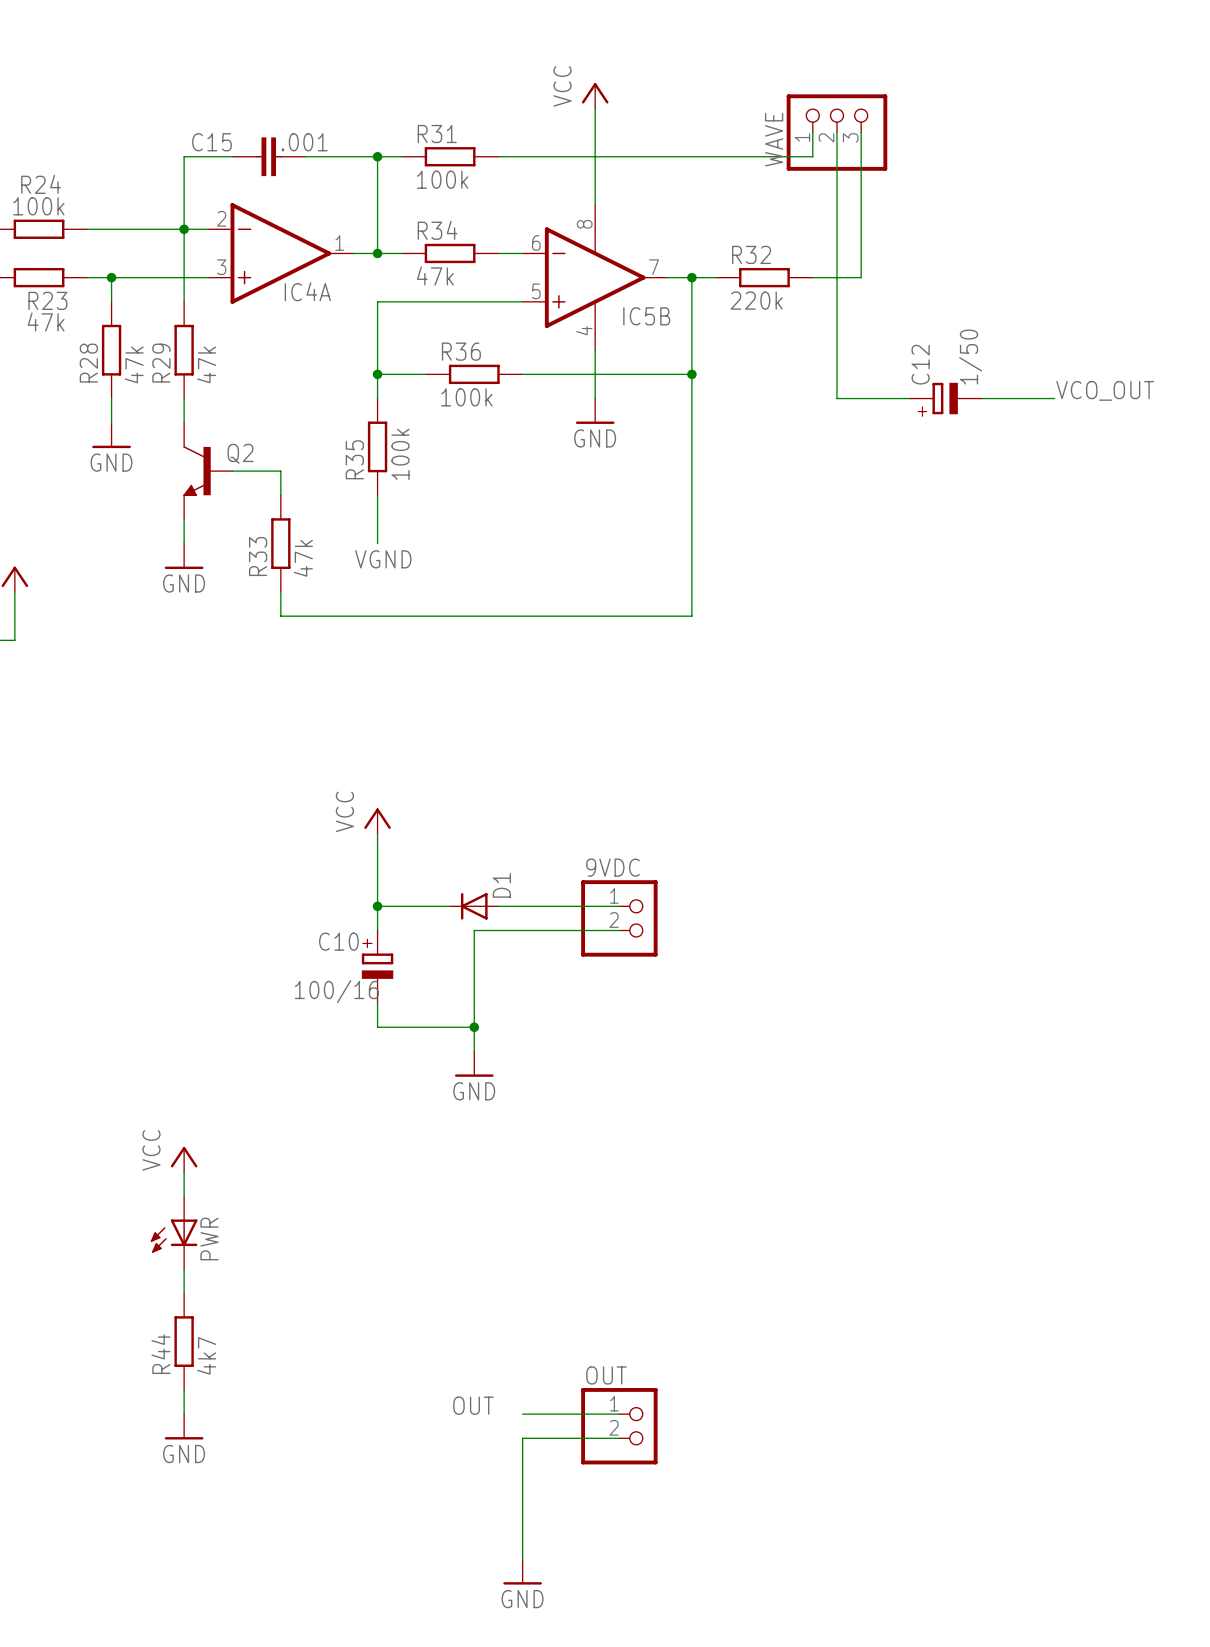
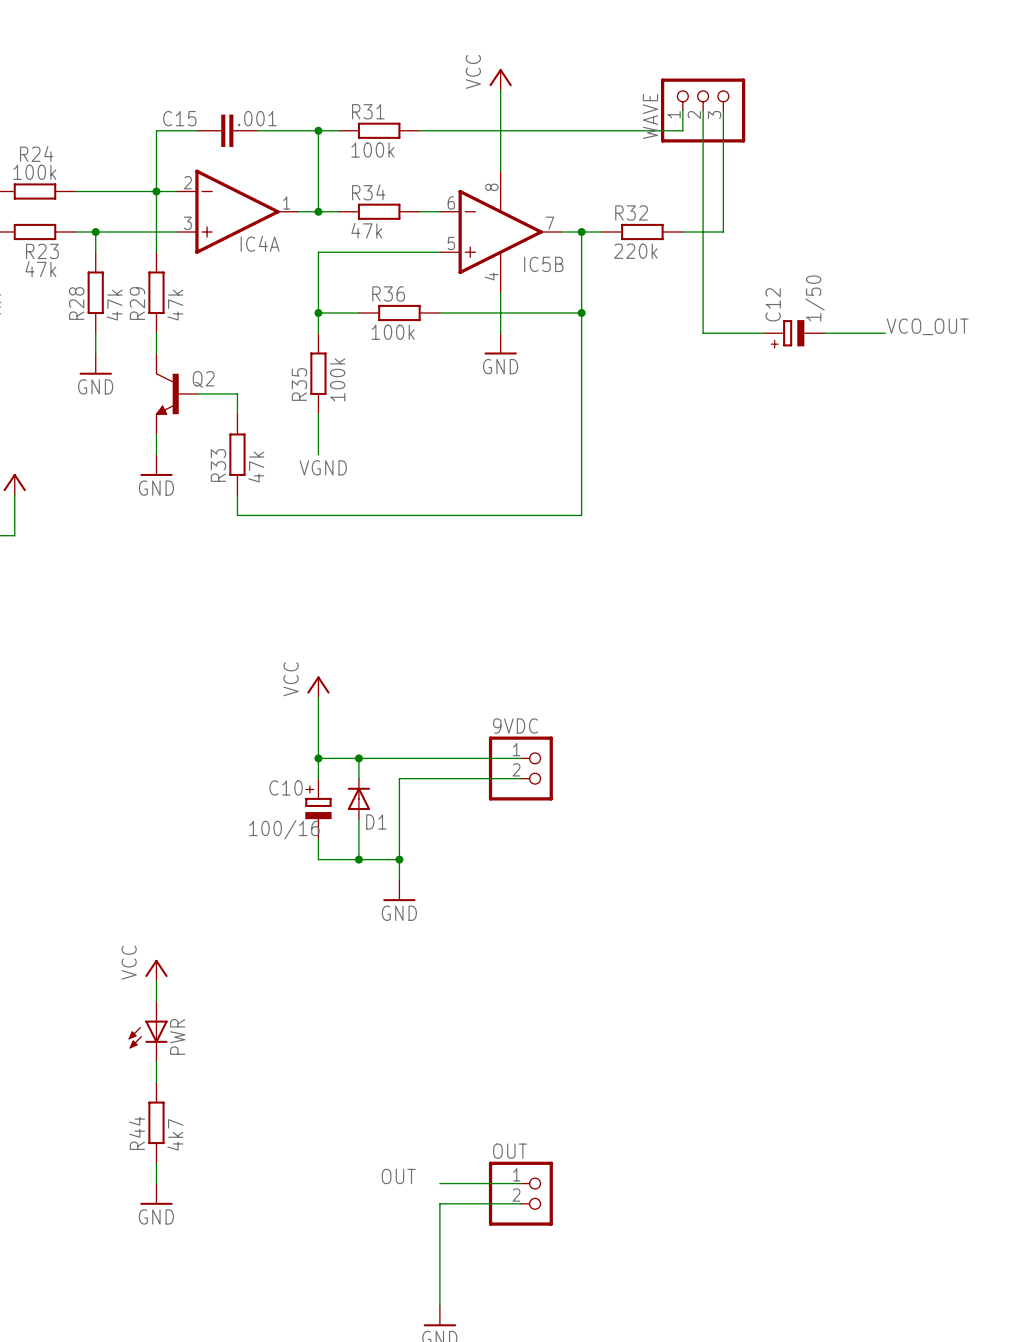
wire: none -> (358, 758) (358, 778)
junction: none -> (358, 758)
D1 rotation: 0° (474, 906) -> 90° clockwise (358, 798)
D1 position: (474, 906) -> (358, 798)
wire: none -> (358, 819) (358, 859)
junction: none -> (358, 859)

